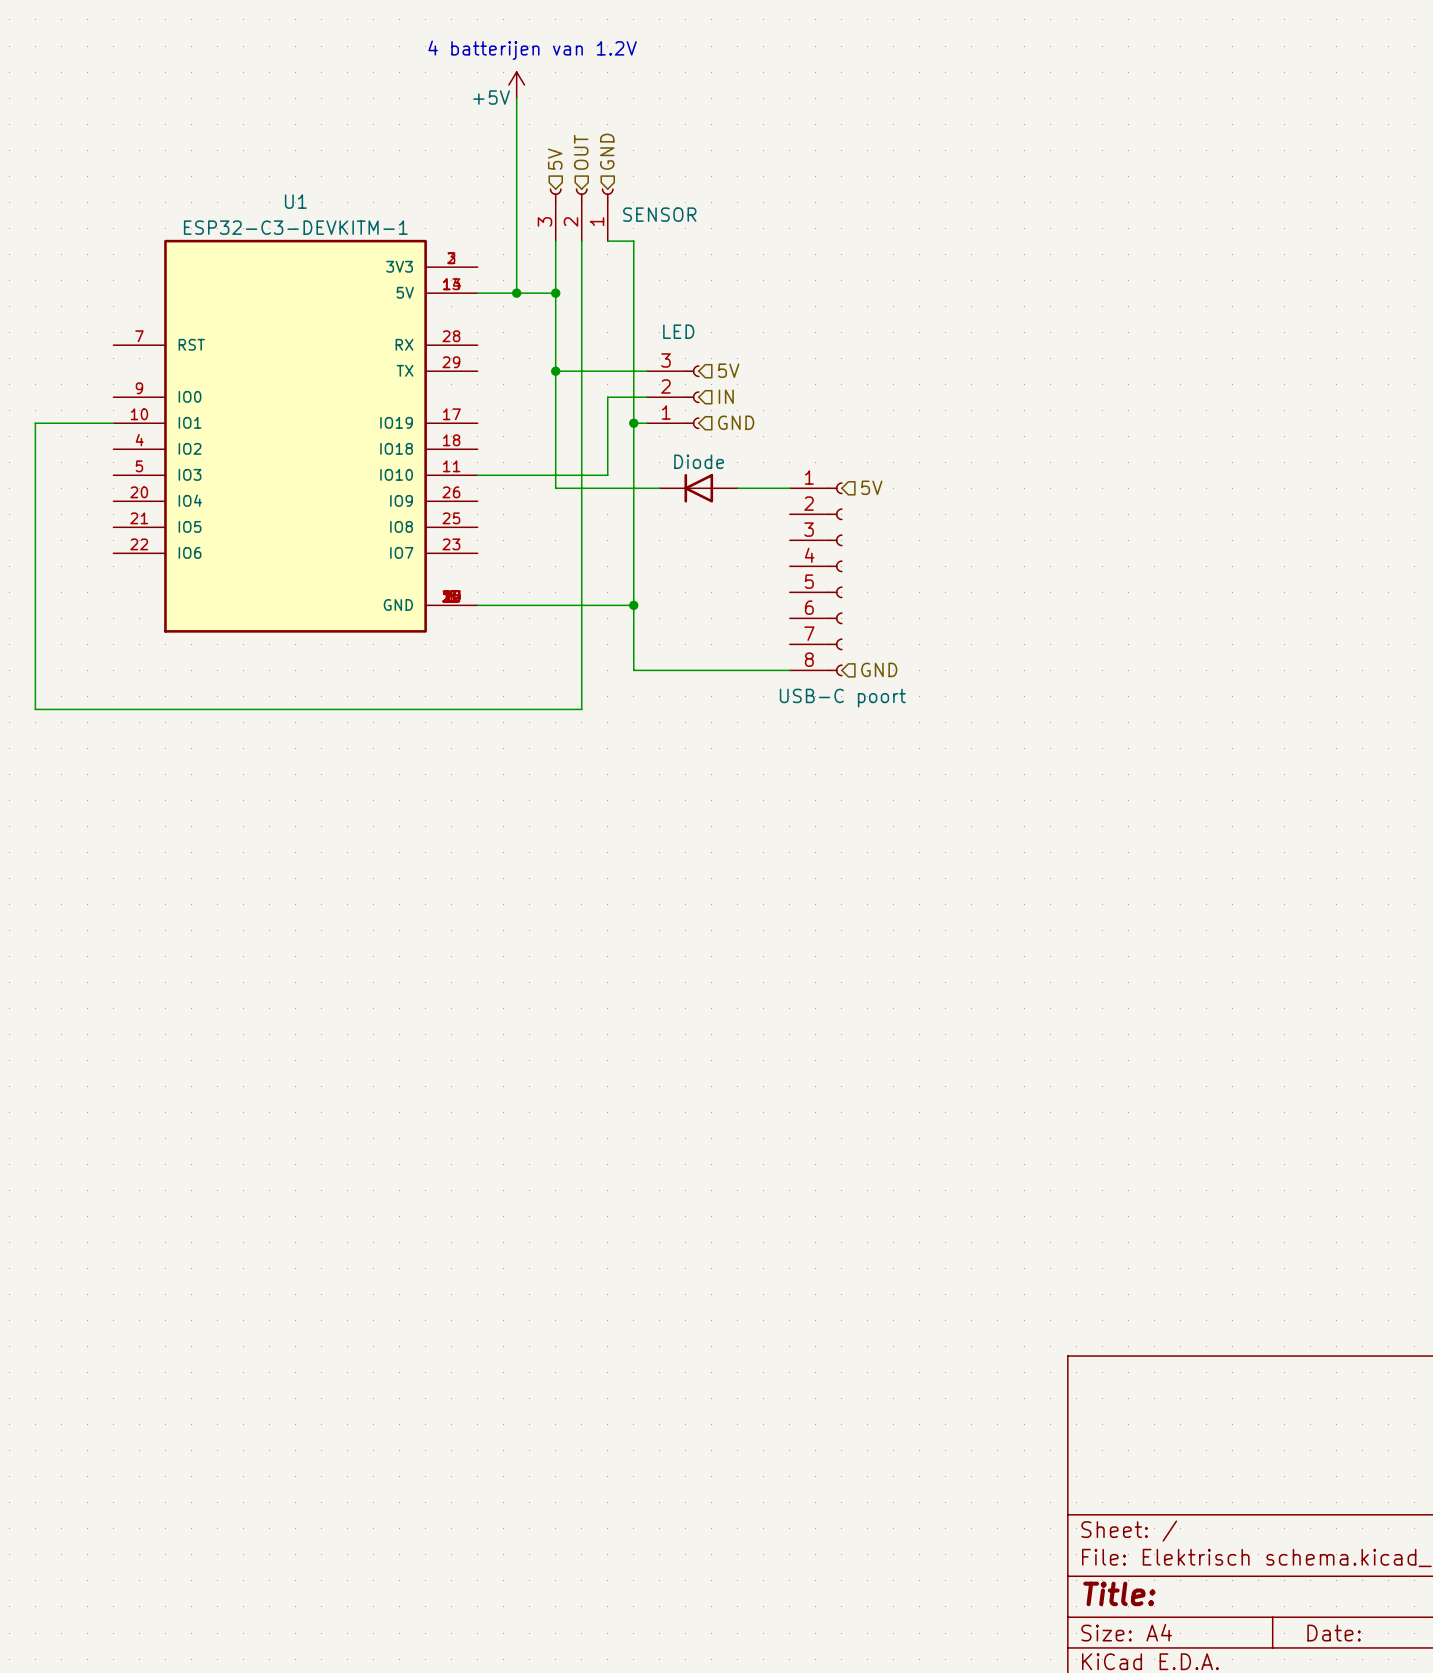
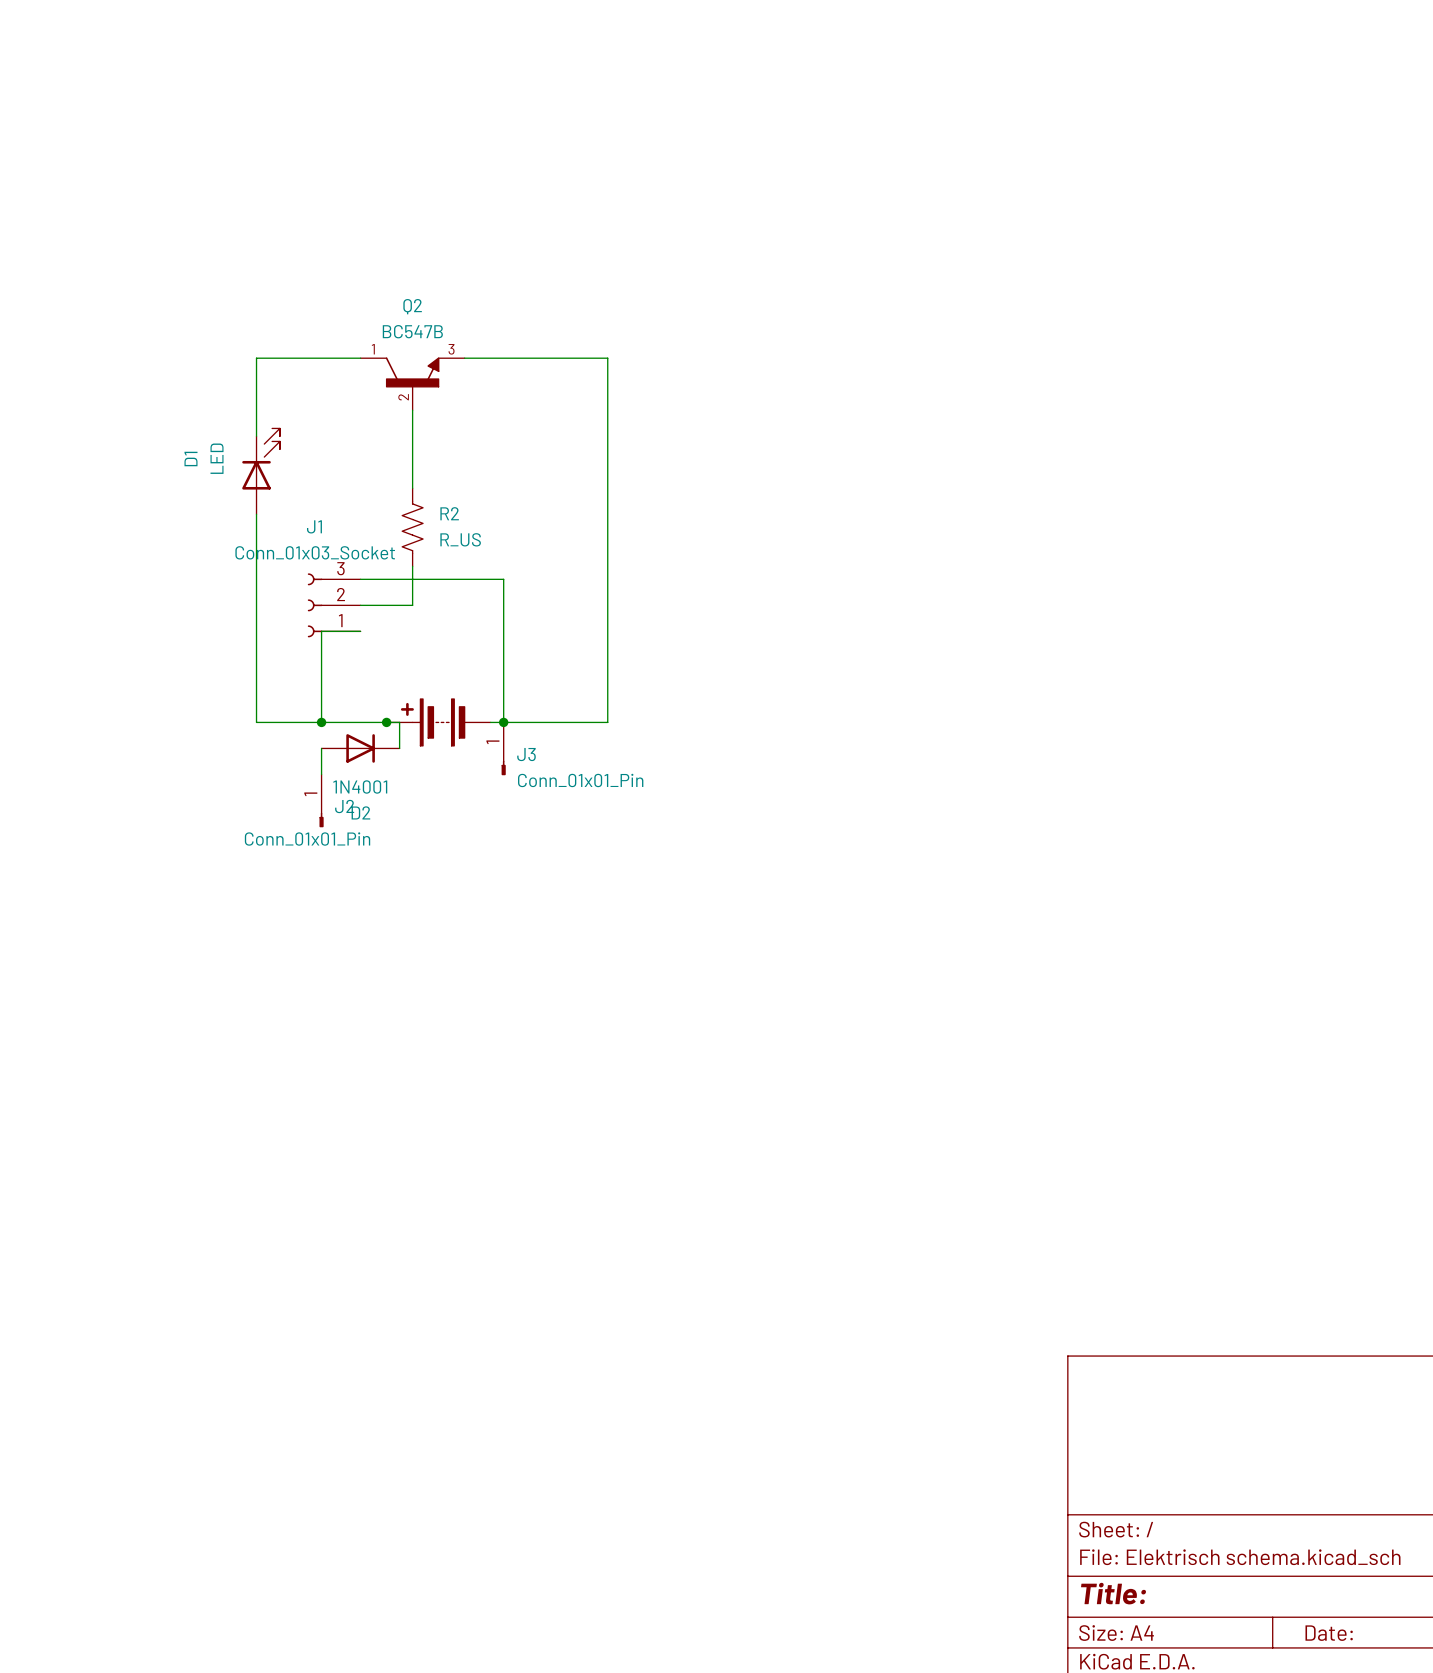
text: 4 batterijen van 1.2V (532, 50) -> none
power symbol: +5V (516, 85) -> none
wire: (516, 98) (516, 293) -> none
hierarchical label: GND (607, 151) -> none
hierarchical label: OUT (581, 152) -> none
hierarchical label: 5V (555, 159) -> none
part: SENSOR (581, 214) -> none
wire: (555, 241) (555, 488) (659, 488) -> none
wire: (581, 241) (581, 709) (35, 709) (35, 423) (113, 423) -> none
wire: (607, 241) (633, 241) (633, 670) (789, 670) -> none
wire: (477, 293) (555, 293) -> none
junction: (516, 293) -> none
junction: (555, 293) -> none
hierarchical label: 5V (728, 370) -> none
wire: (555, 371) (646, 371) -> none
junction: (555, 371) -> none
Q2: none -> BC547B (412, 383)
hierarchical label: IN (726, 396) -> none
wire: (607, 397) (646, 397) -> (607, 397) (607, 358) (464, 358)
part: LED (673, 397) -> none
hierarchical label: GND (736, 422) -> none
wire: (633, 423) (646, 423) -> none
junction: (633, 423) -> none
U1: ESP32-C3-DEVKITM-1 (295, 436) -> none
D1: none -> LED (261, 471)
wire: (477, 475) (607, 475) -> (490, 722) (607, 722) (607, 475)
hierarchical label: 5V (871, 487) -> none
part: Diode (698, 488) -> none
wire: (737, 488) (789, 488) -> none
wire: none -> (256, 514) (256, 722) (399, 722) (399, 748)
R2: none -> R_US (412, 527)
wire: none -> (360, 579) (503, 579) (503, 722)
part: USB-C poort (816, 579) -> none
J1: none -> Conn_01x03_Socket (334, 605)
wire: (477, 605) (633, 605) -> none
junction: (633, 605) -> none
wire: none -> (360, 631) (321, 631) (321, 722)
hierarchical label: GND (879, 669) -> none
junction: none -> (321, 722)
junction: none -> (386, 722)
part: none -> (438, 722)
junction: none -> (503, 722)
wire: none -> (321, 748) (321, 774)
D2: none -> 1N4001 (360, 748)
J3: none -> Conn_01x01_Pin (503, 748)
J2: none -> Conn_01x01_Pin (321, 800)

